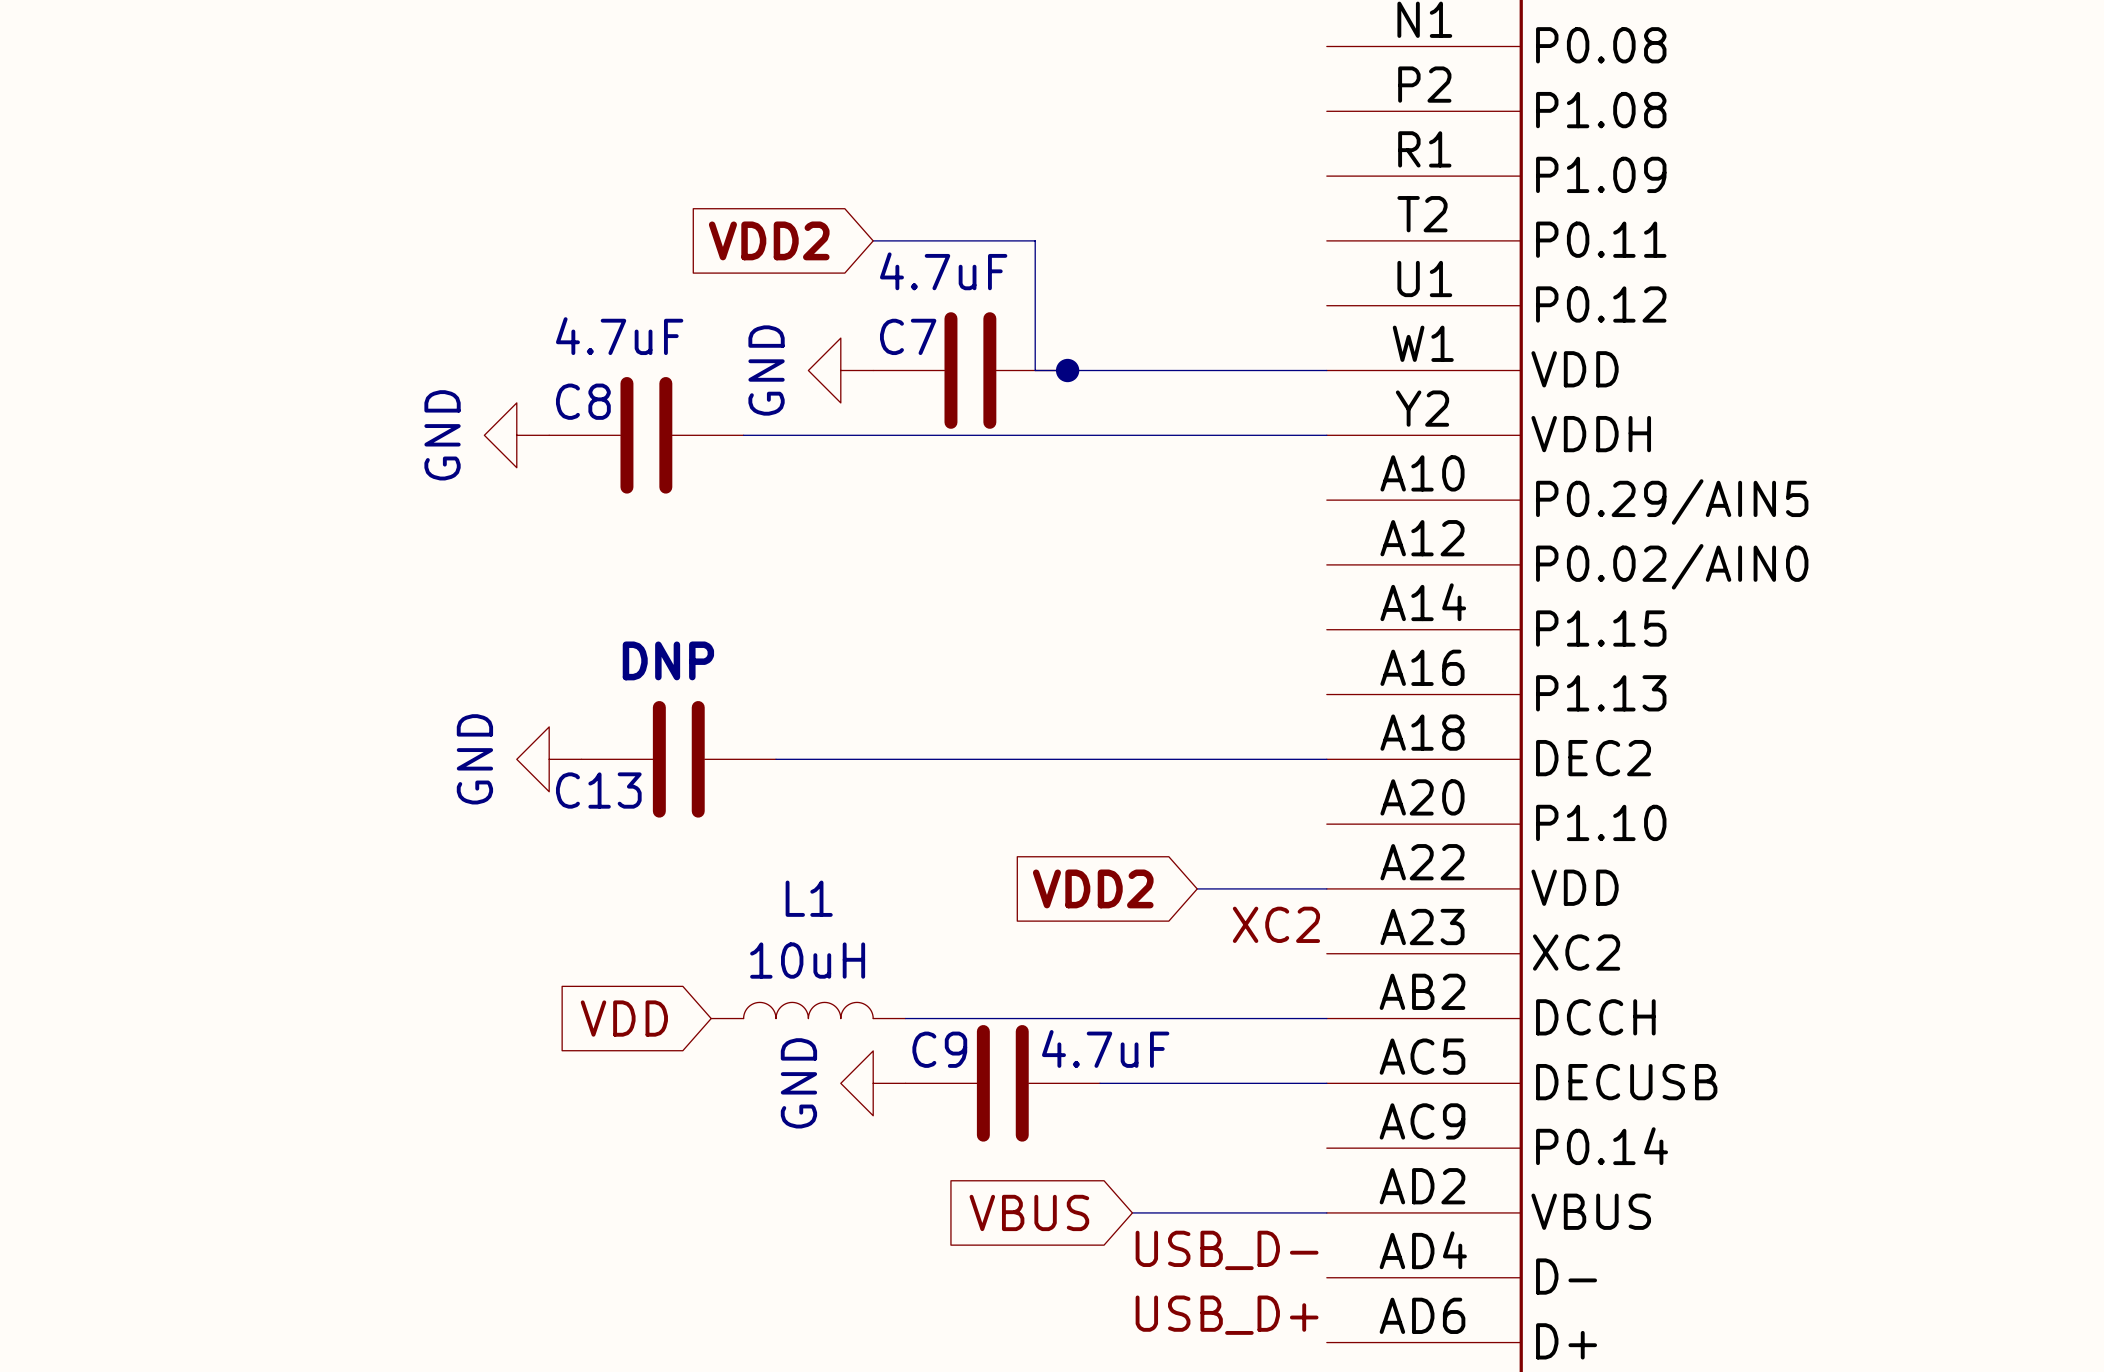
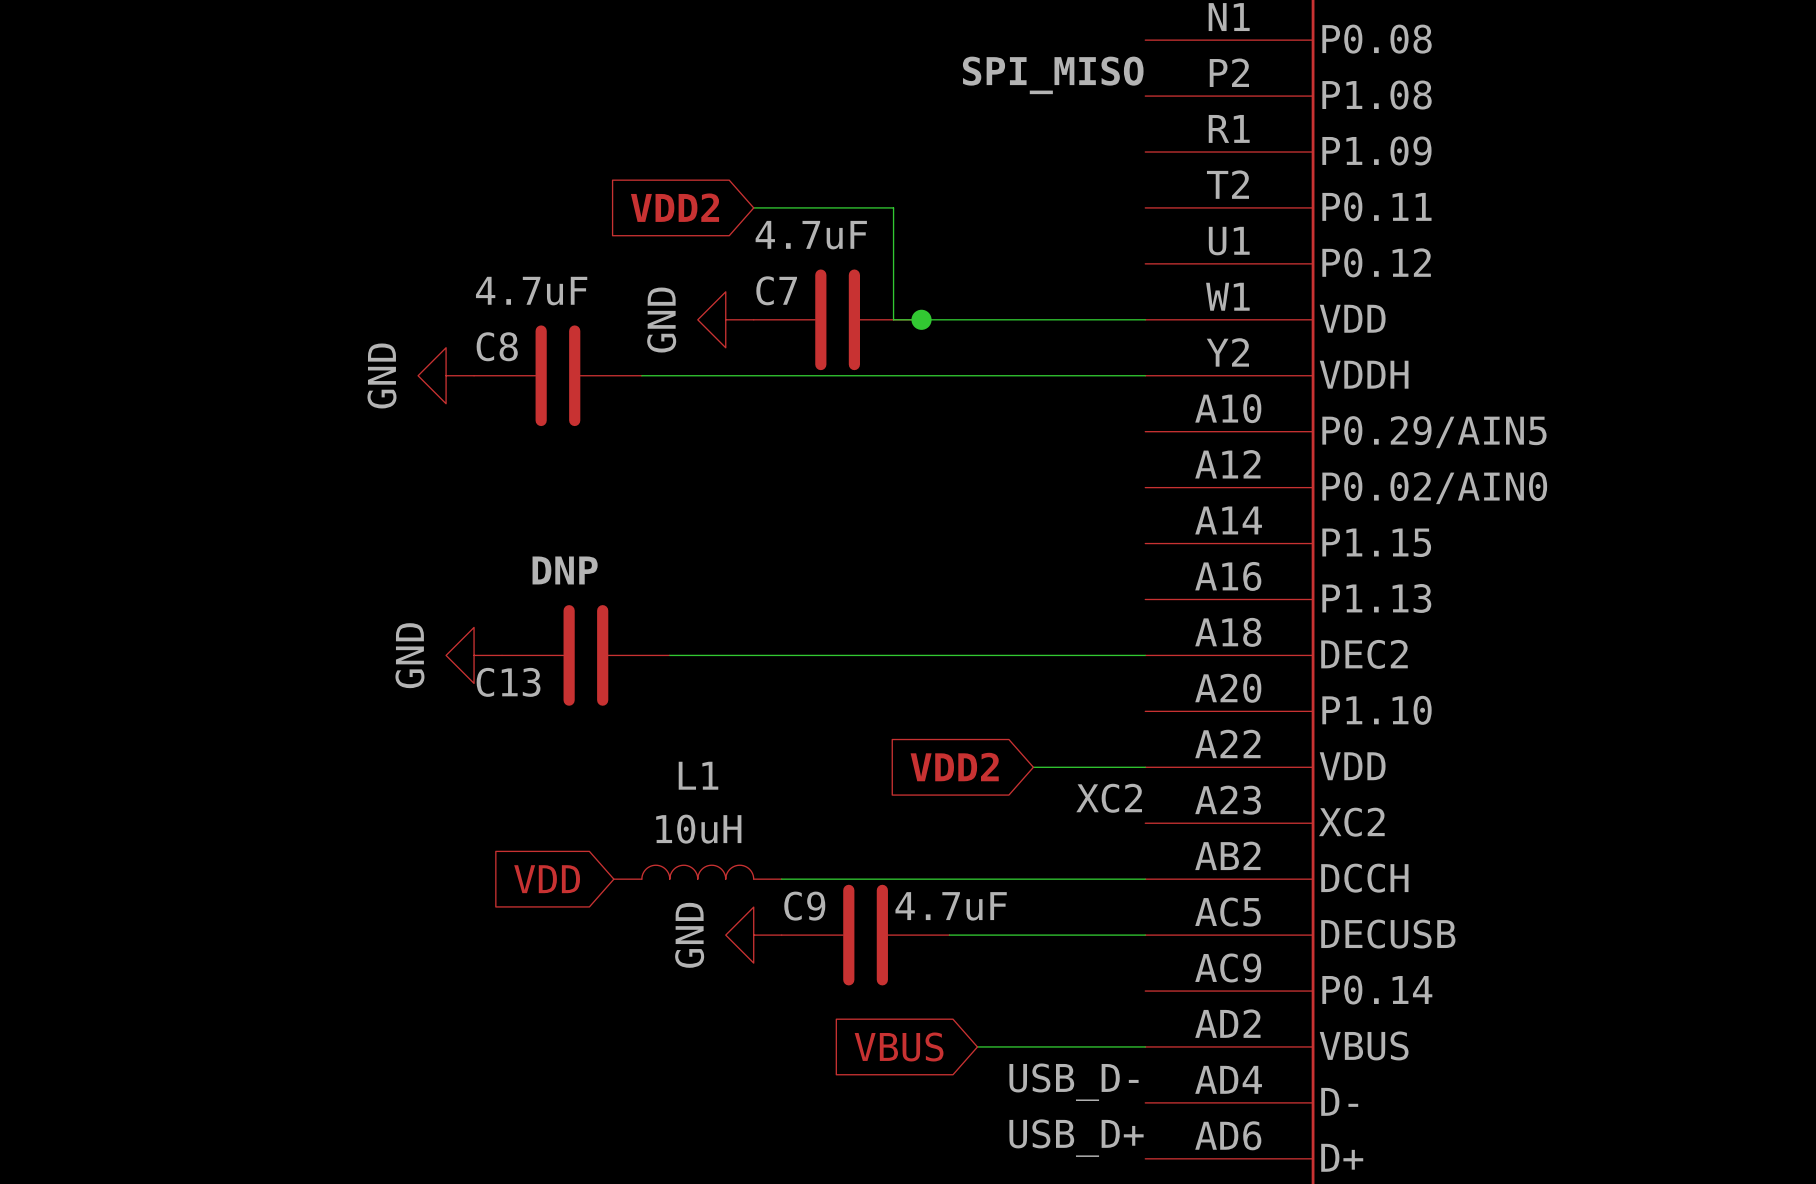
label: none -> SPI_MISO (1053, 75)

